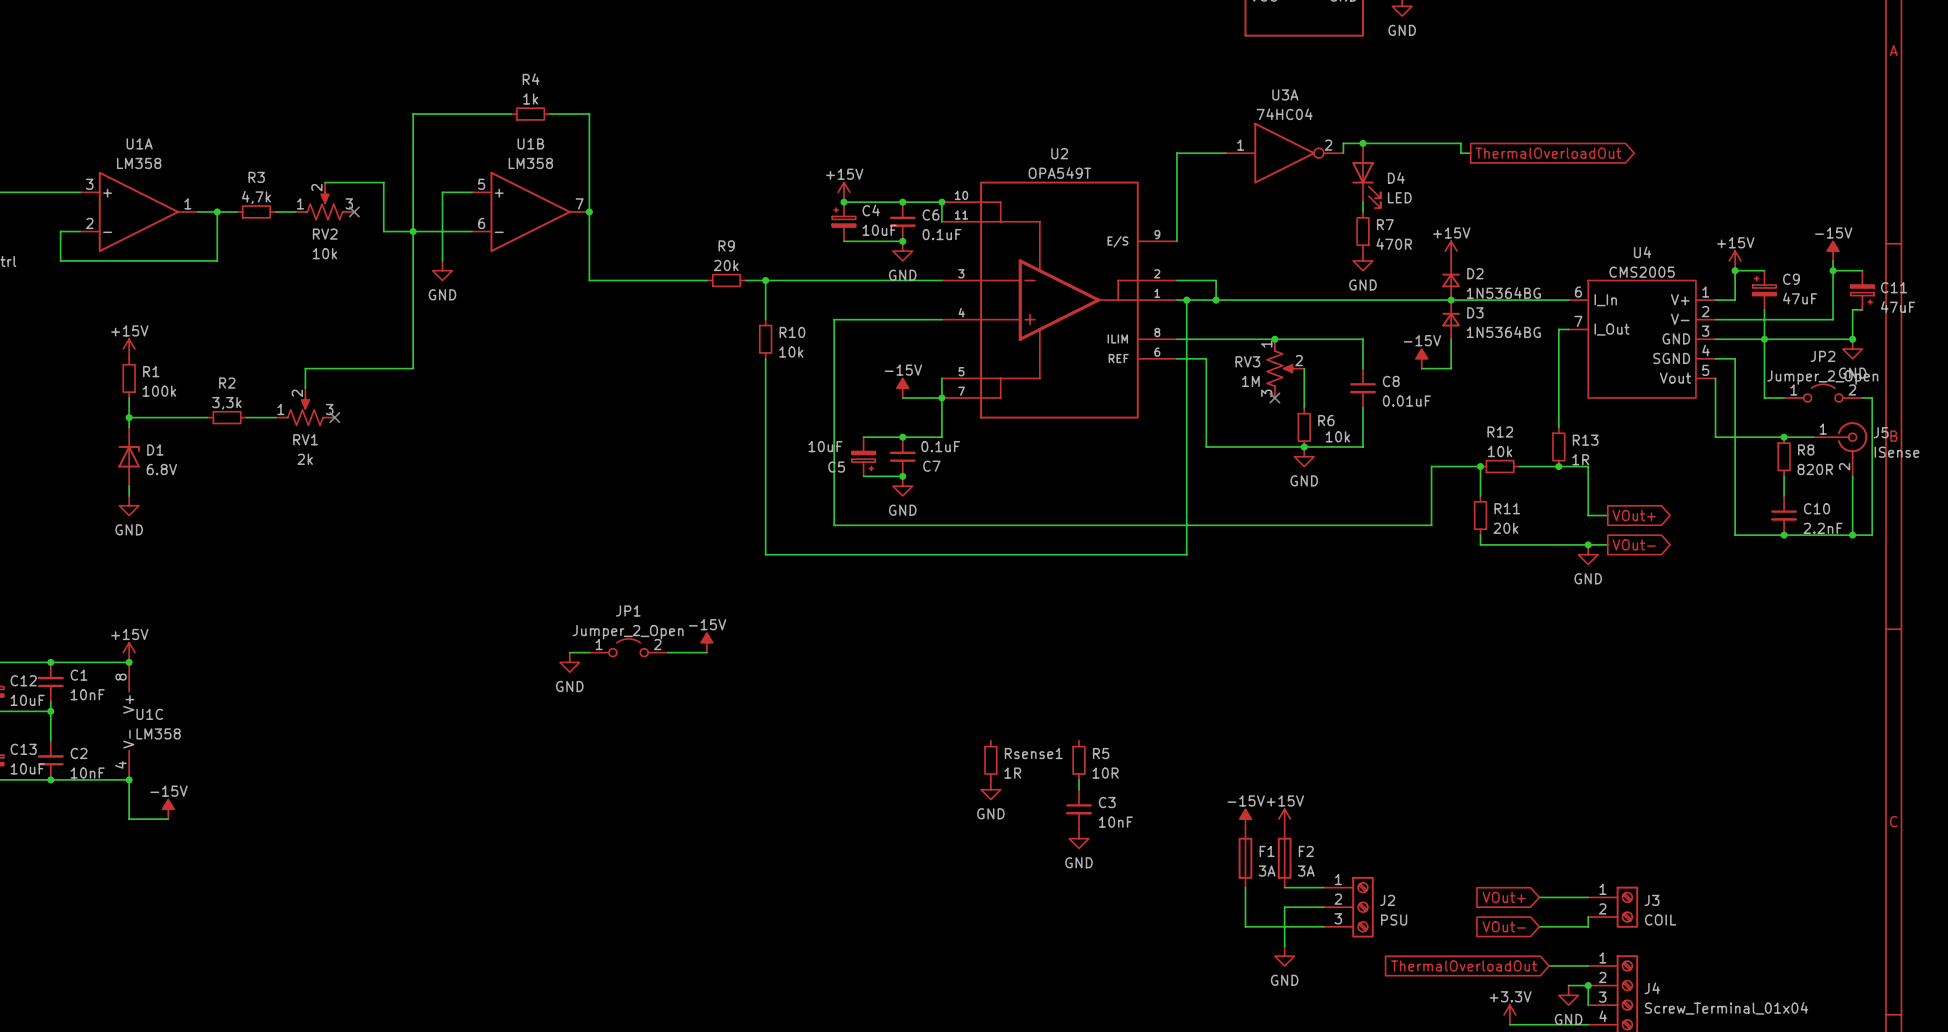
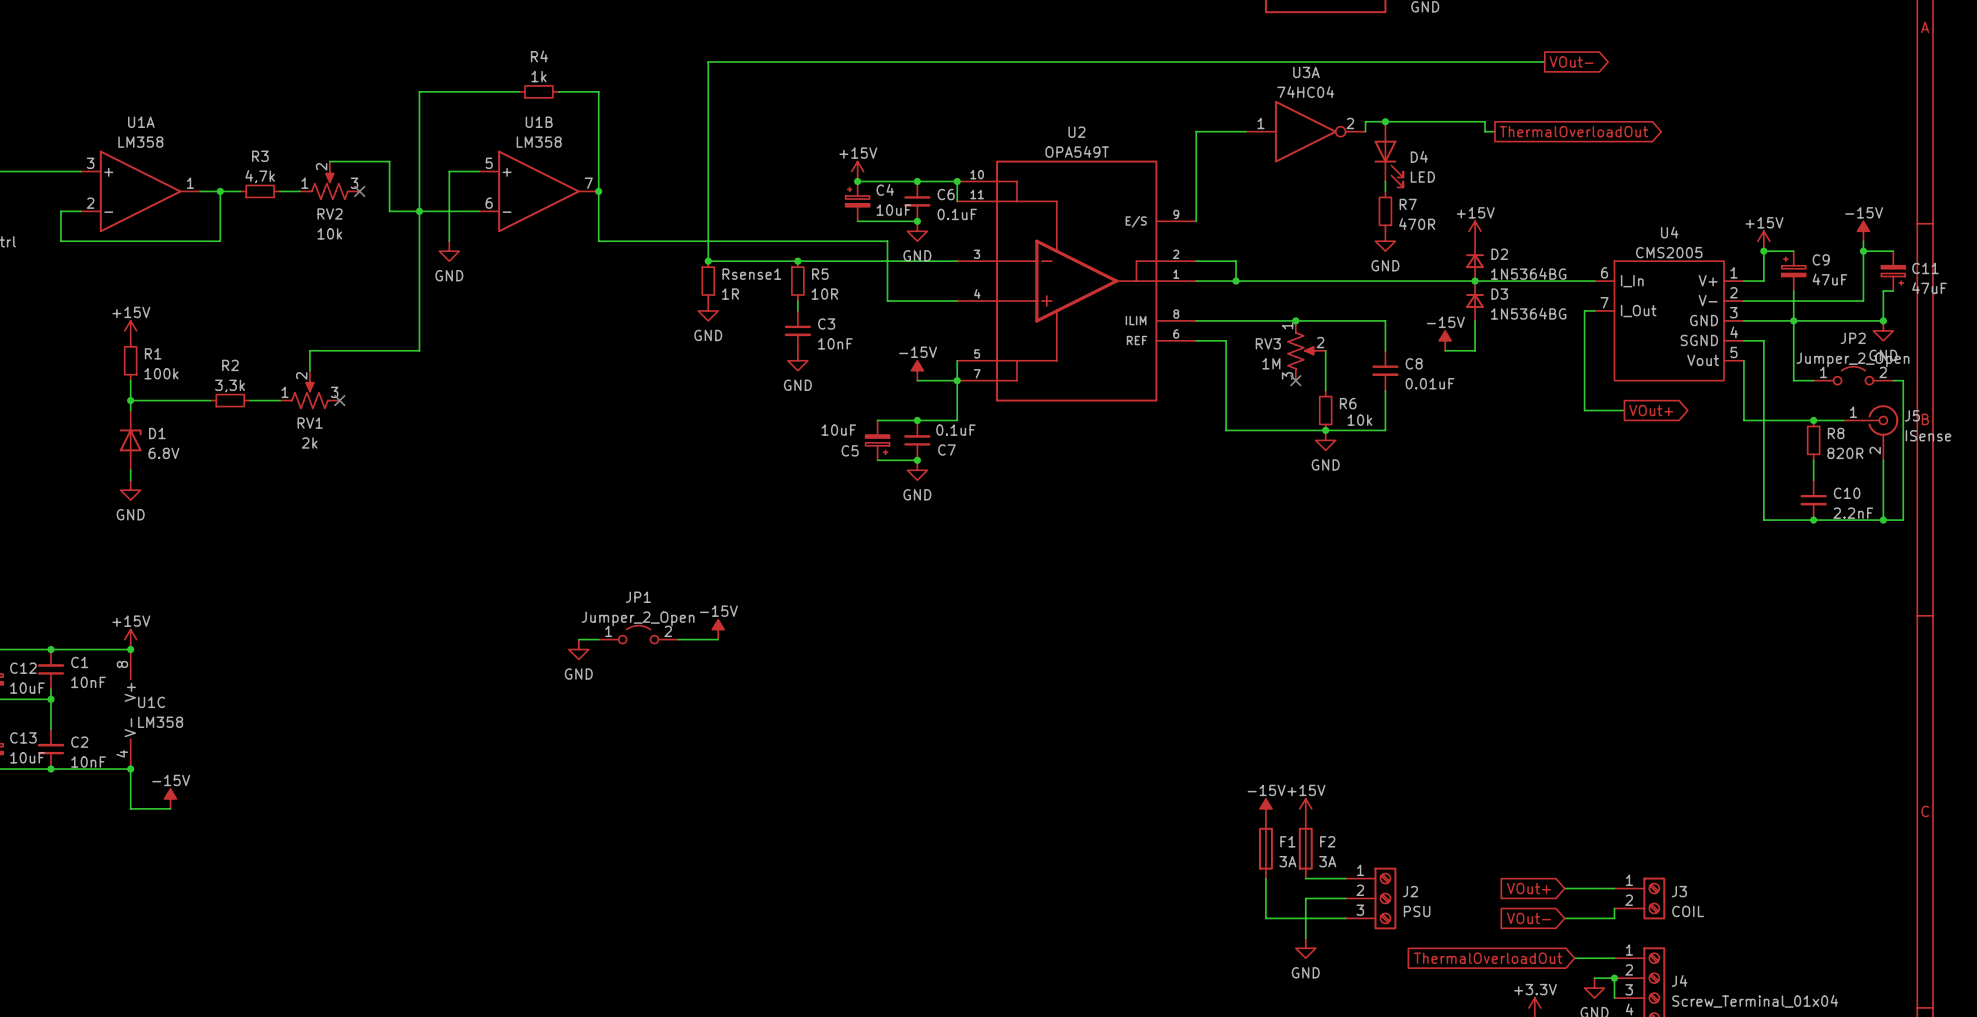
wire: none -> (1544, 61) (708, 61) (708, 261)
global label: none -> VOut- (1571, 61)
wire: (589, 260) (589, 280) (697, 280) -> (598, 241) (887, 241) (887, 300)
junction: none -> (708, 261)
wire: none -> (718, 261) (758, 261)
R9: 20k (726, 280) -> none
wire: (765, 280) (765, 319) -> none
junction position: (765, 280) -> (797, 261)
wire: (1186, 300) (1186, 554) (765, 554) (765, 358) -> none
junction: (1186, 300) -> none
wire: none -> (797, 300) (797, 310)
wire: (873, 319) (834, 319) (834, 525) (1431, 525) (1431, 466) (1480, 466) (1480, 495) -> none
power symbol: none -> GND (708, 310)
R10: 10k (765, 339) -> none
power symbol: none -> GND (797, 360)
wire: none -> (1584, 410) (1624, 410)
R13: 1R (1558, 446) -> none
junction: (1480, 466) -> none
R12: 10k (1500, 466) -> none
wire: (1519, 466) (1588, 466) (1588, 515) (1607, 515) -> none
junction: (1558, 466) -> none
R11: 20k (1480, 515) -> none
global label position: VOut+ (1634, 515) -> VOut+ (1651, 410)
wire: (1480, 535) (1480, 544) (1607, 544) -> none
junction: (1588, 544) -> none
global label: VOut- (1634, 544) -> none
power symbol: GND (1588, 554) -> none
Rsense1 position: (990, 760) -> (708, 281)
R5 position: (1079, 760) -> (797, 281)
wire: (1079, 779) (1079, 789) -> none
power symbol: GND (990, 789) -> none
C3 position: (1079, 809) -> (797, 330)
power symbol: GND (1079, 838) -> none

